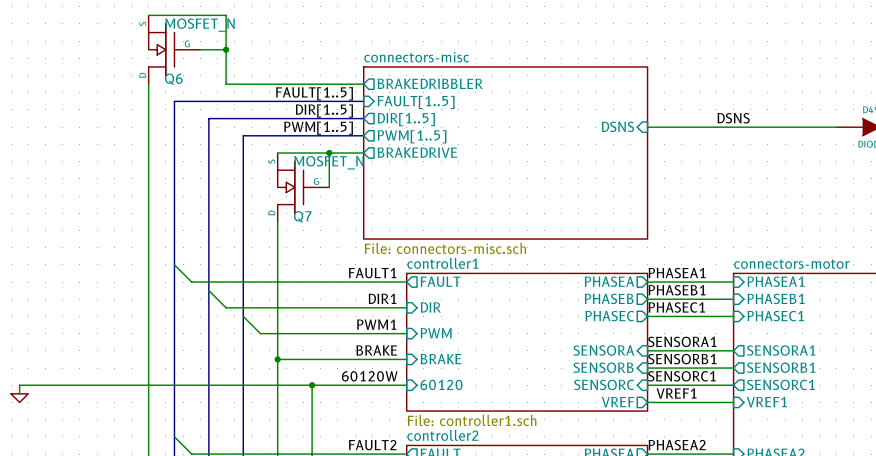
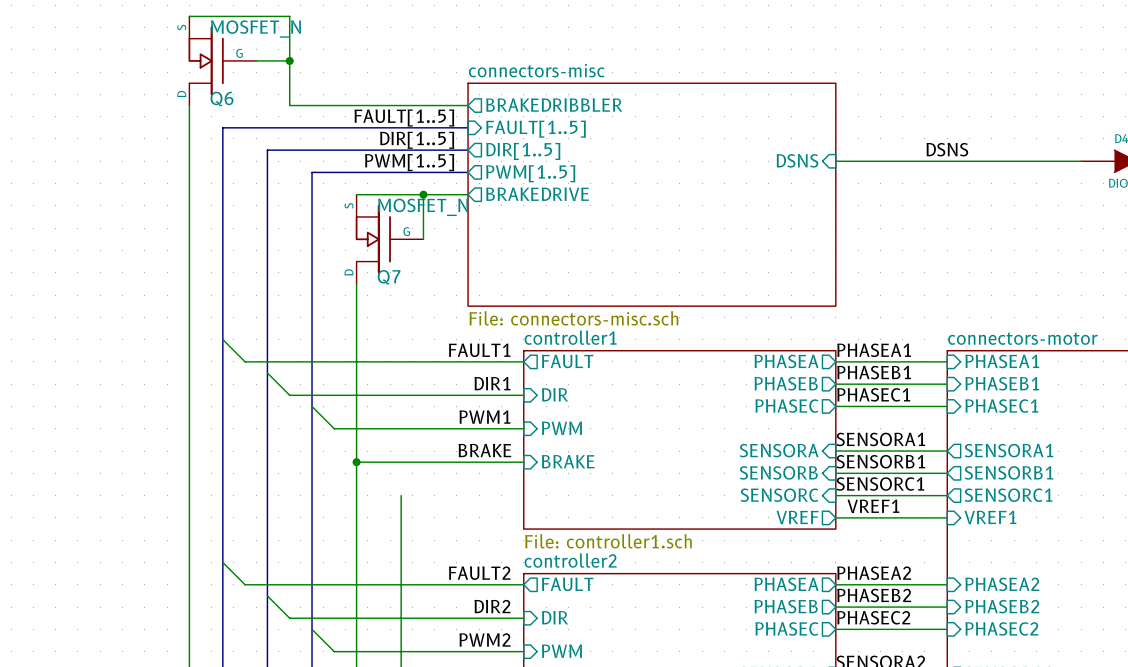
label: 60120W (369, 376) -> none
sheet pin: 60120 (441, 384) -> none
junction: (312, 385) -> none
wire: (406, 385) (19, 385) (19, 393) -> none
power symbol: (19, 398) -> none

